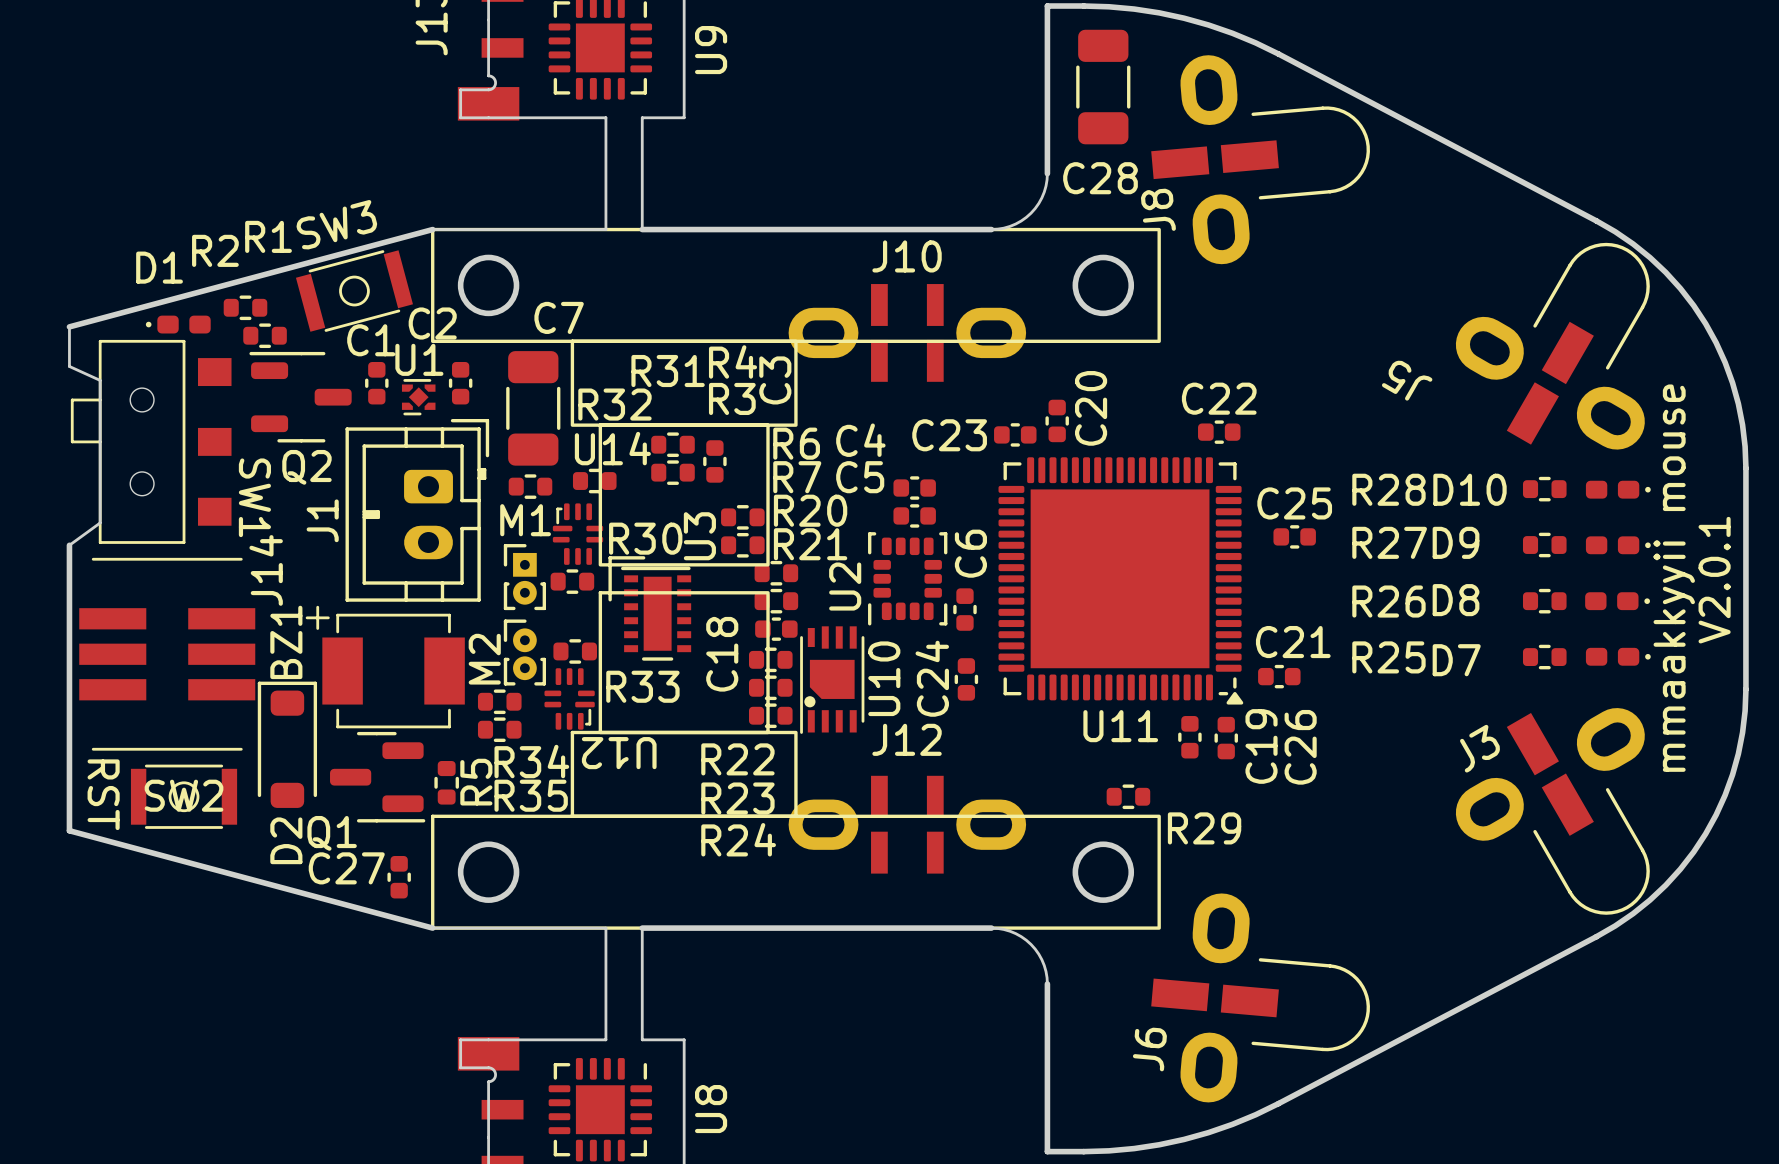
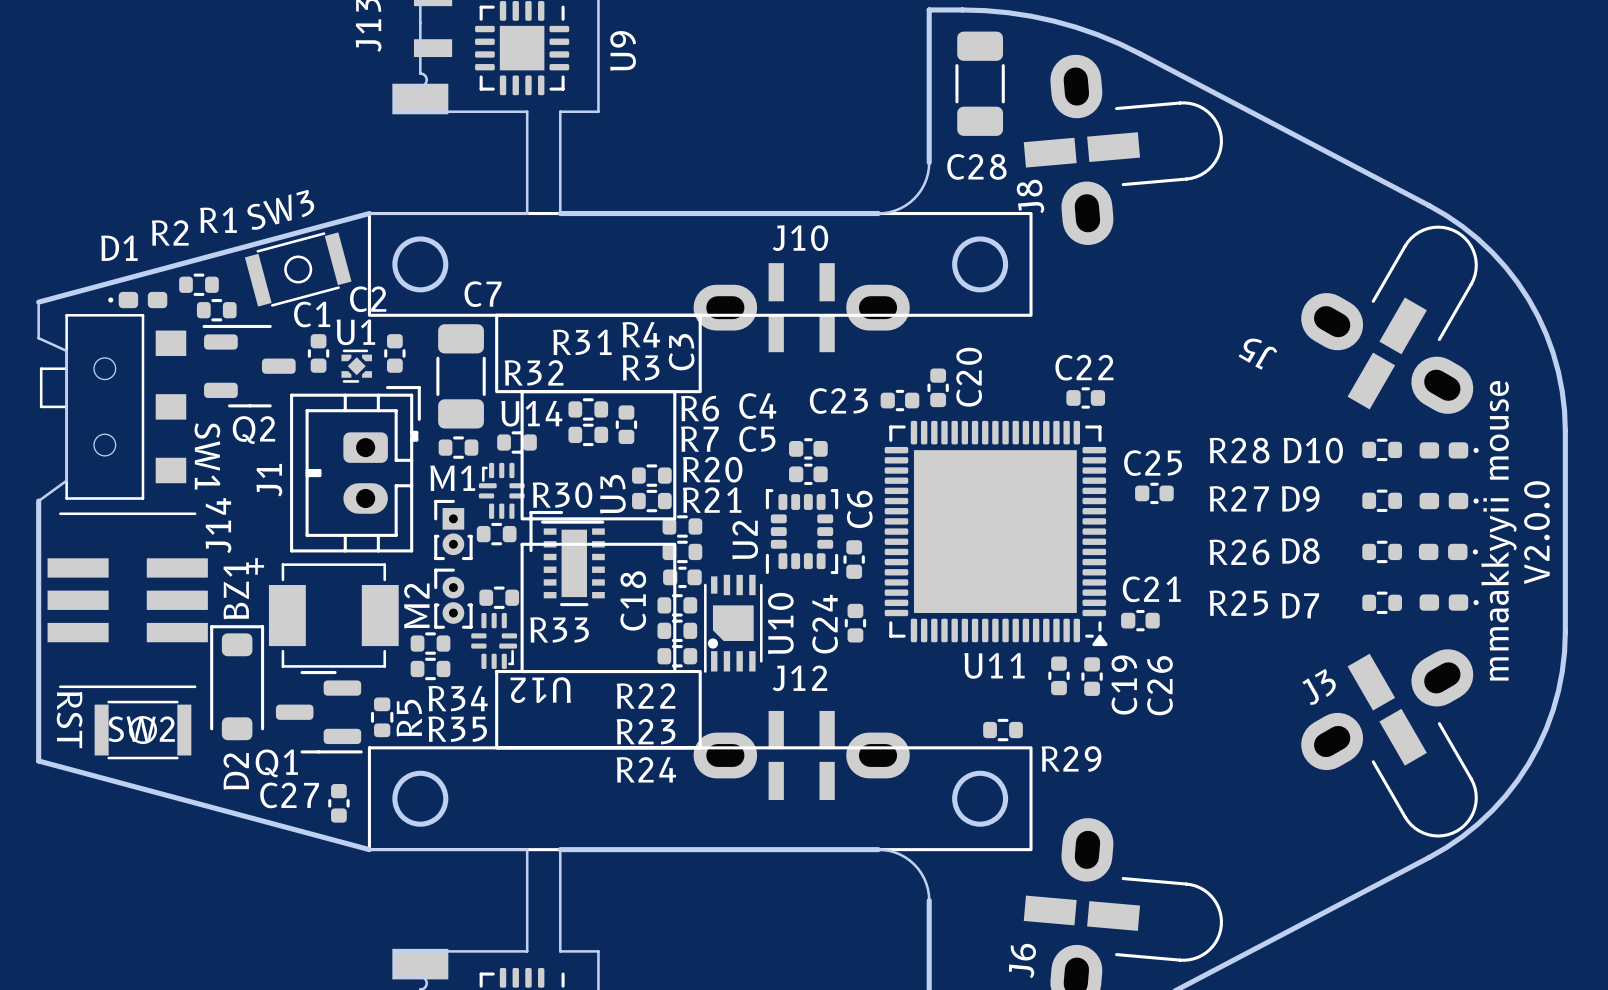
text: V2.0.1 (1714, 580) -> V2.0.0 (1536, 532)

